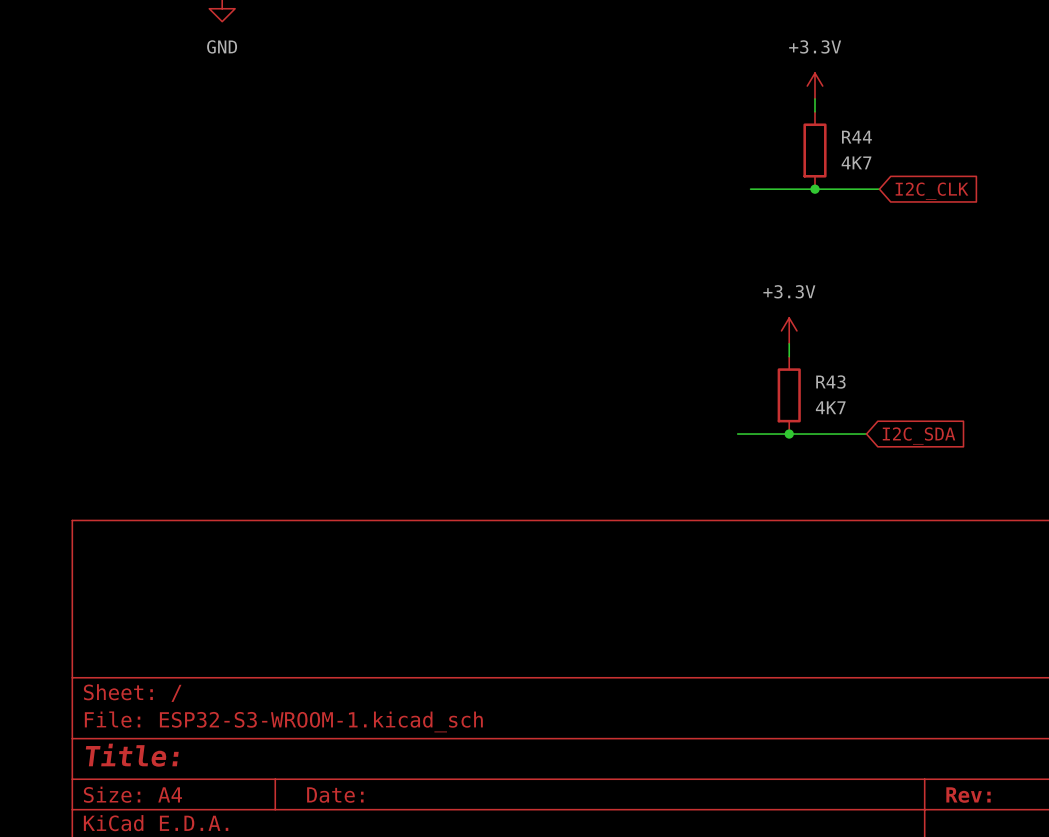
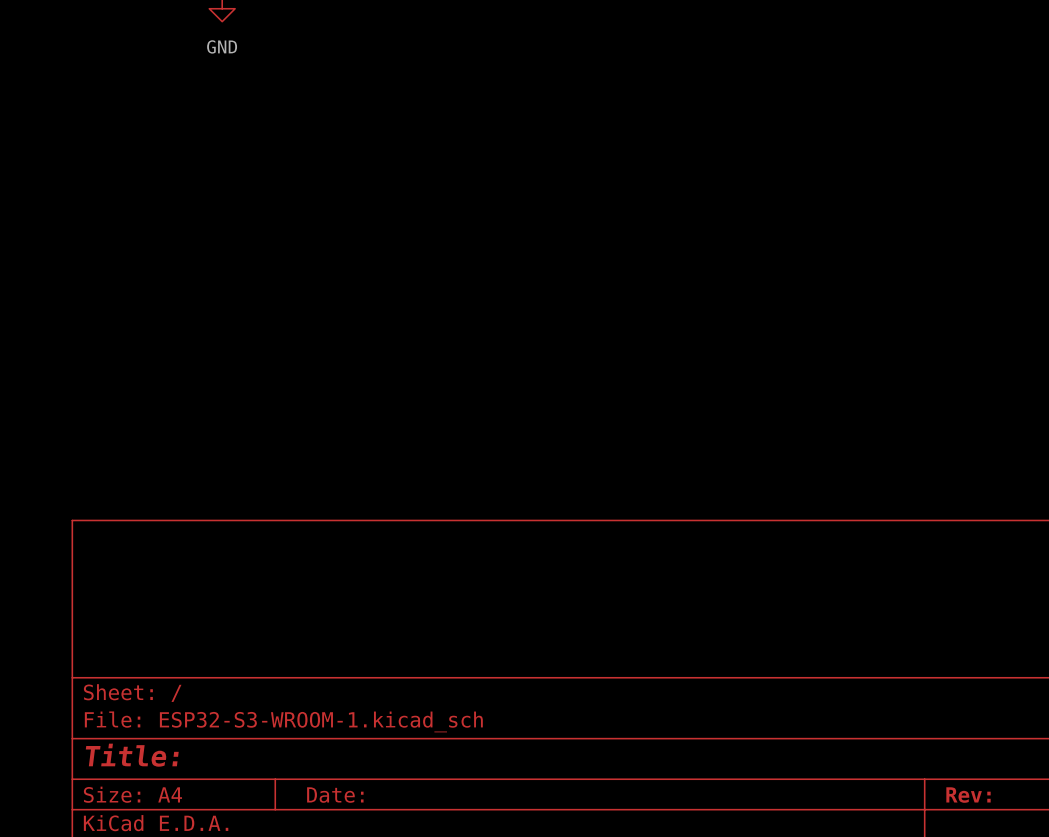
power symbol: +3.3V (815, 86) -> none
wire: (815, 98) (815, 111) -> none
R44: 4K7 (815, 150) -> none
wire: (750, 189) (879, 189) -> none
junction: (815, 189) -> none
global label: I2C_CLK (932, 191) -> none
power symbol: +3.3V (789, 330) -> none
wire: (789, 343) (789, 356) -> none
R43: 4K7 (789, 395) -> none
wire: (737, 434) (866, 434) -> none
junction: (789, 434) -> none
global label: I2C_SDA (919, 435) -> none

